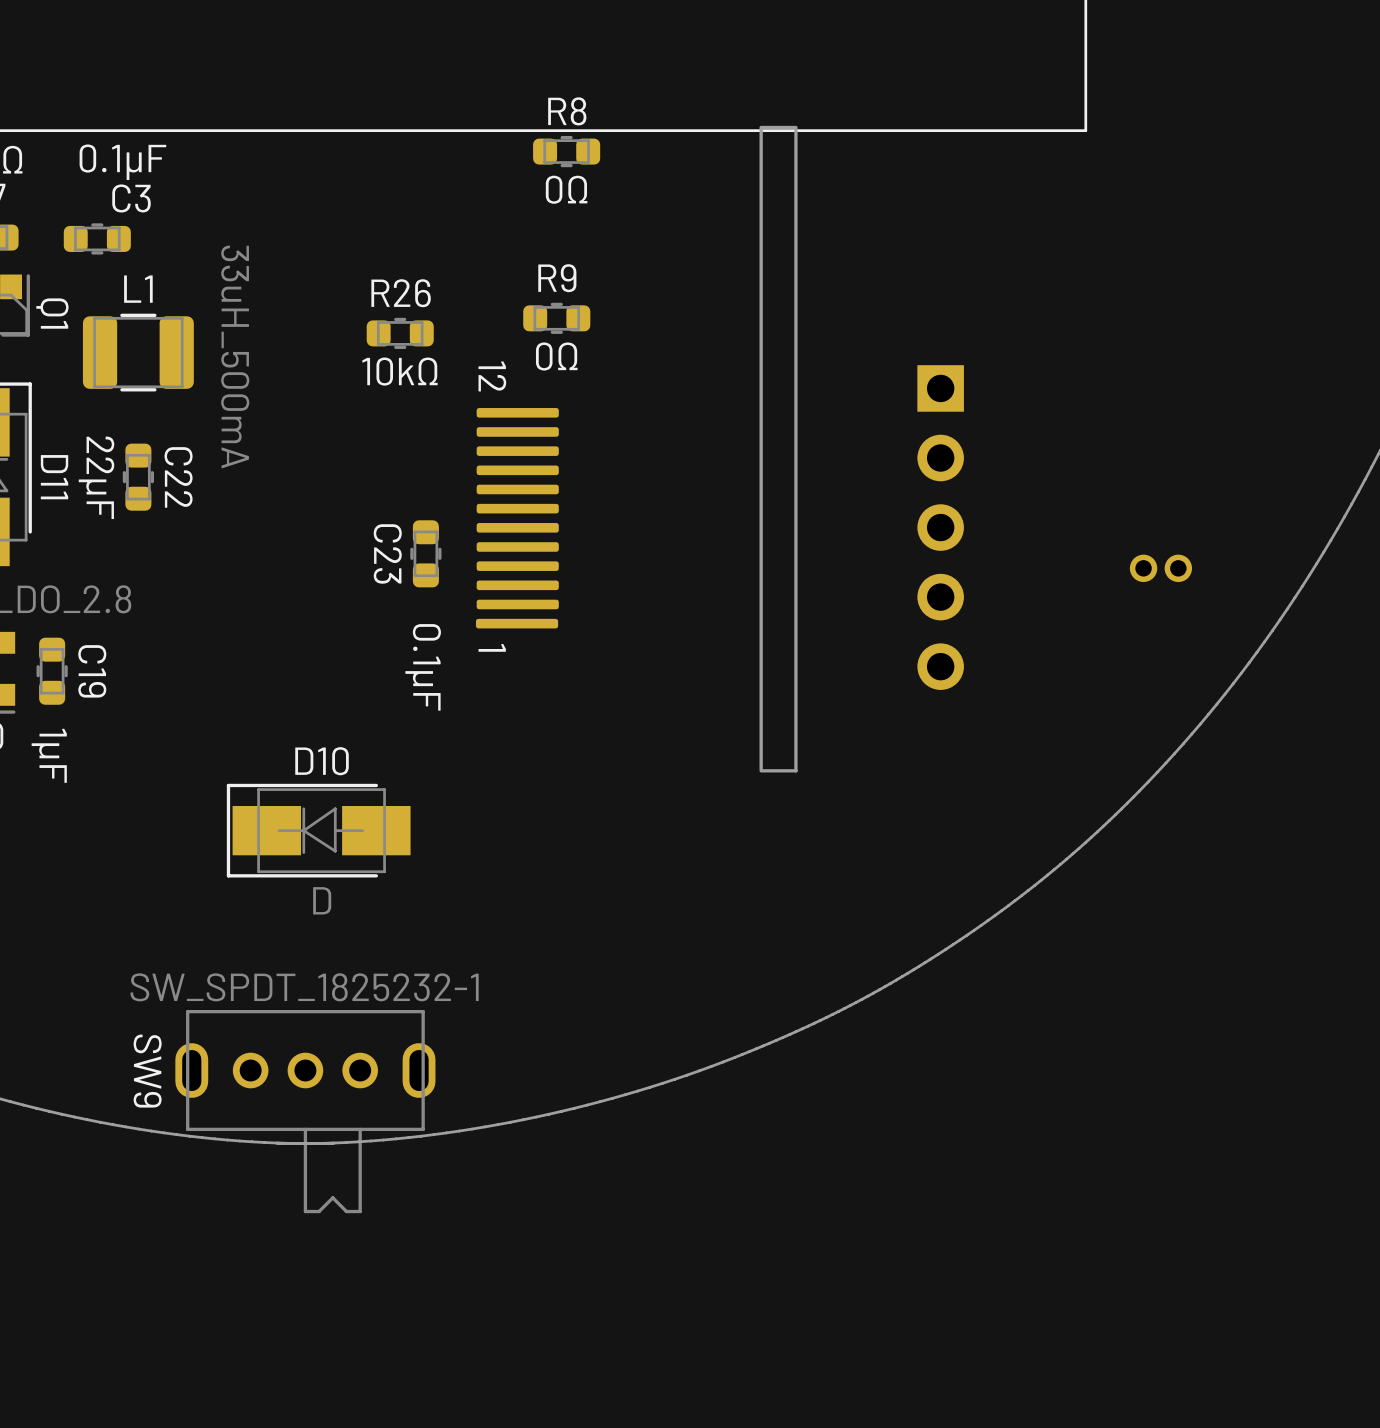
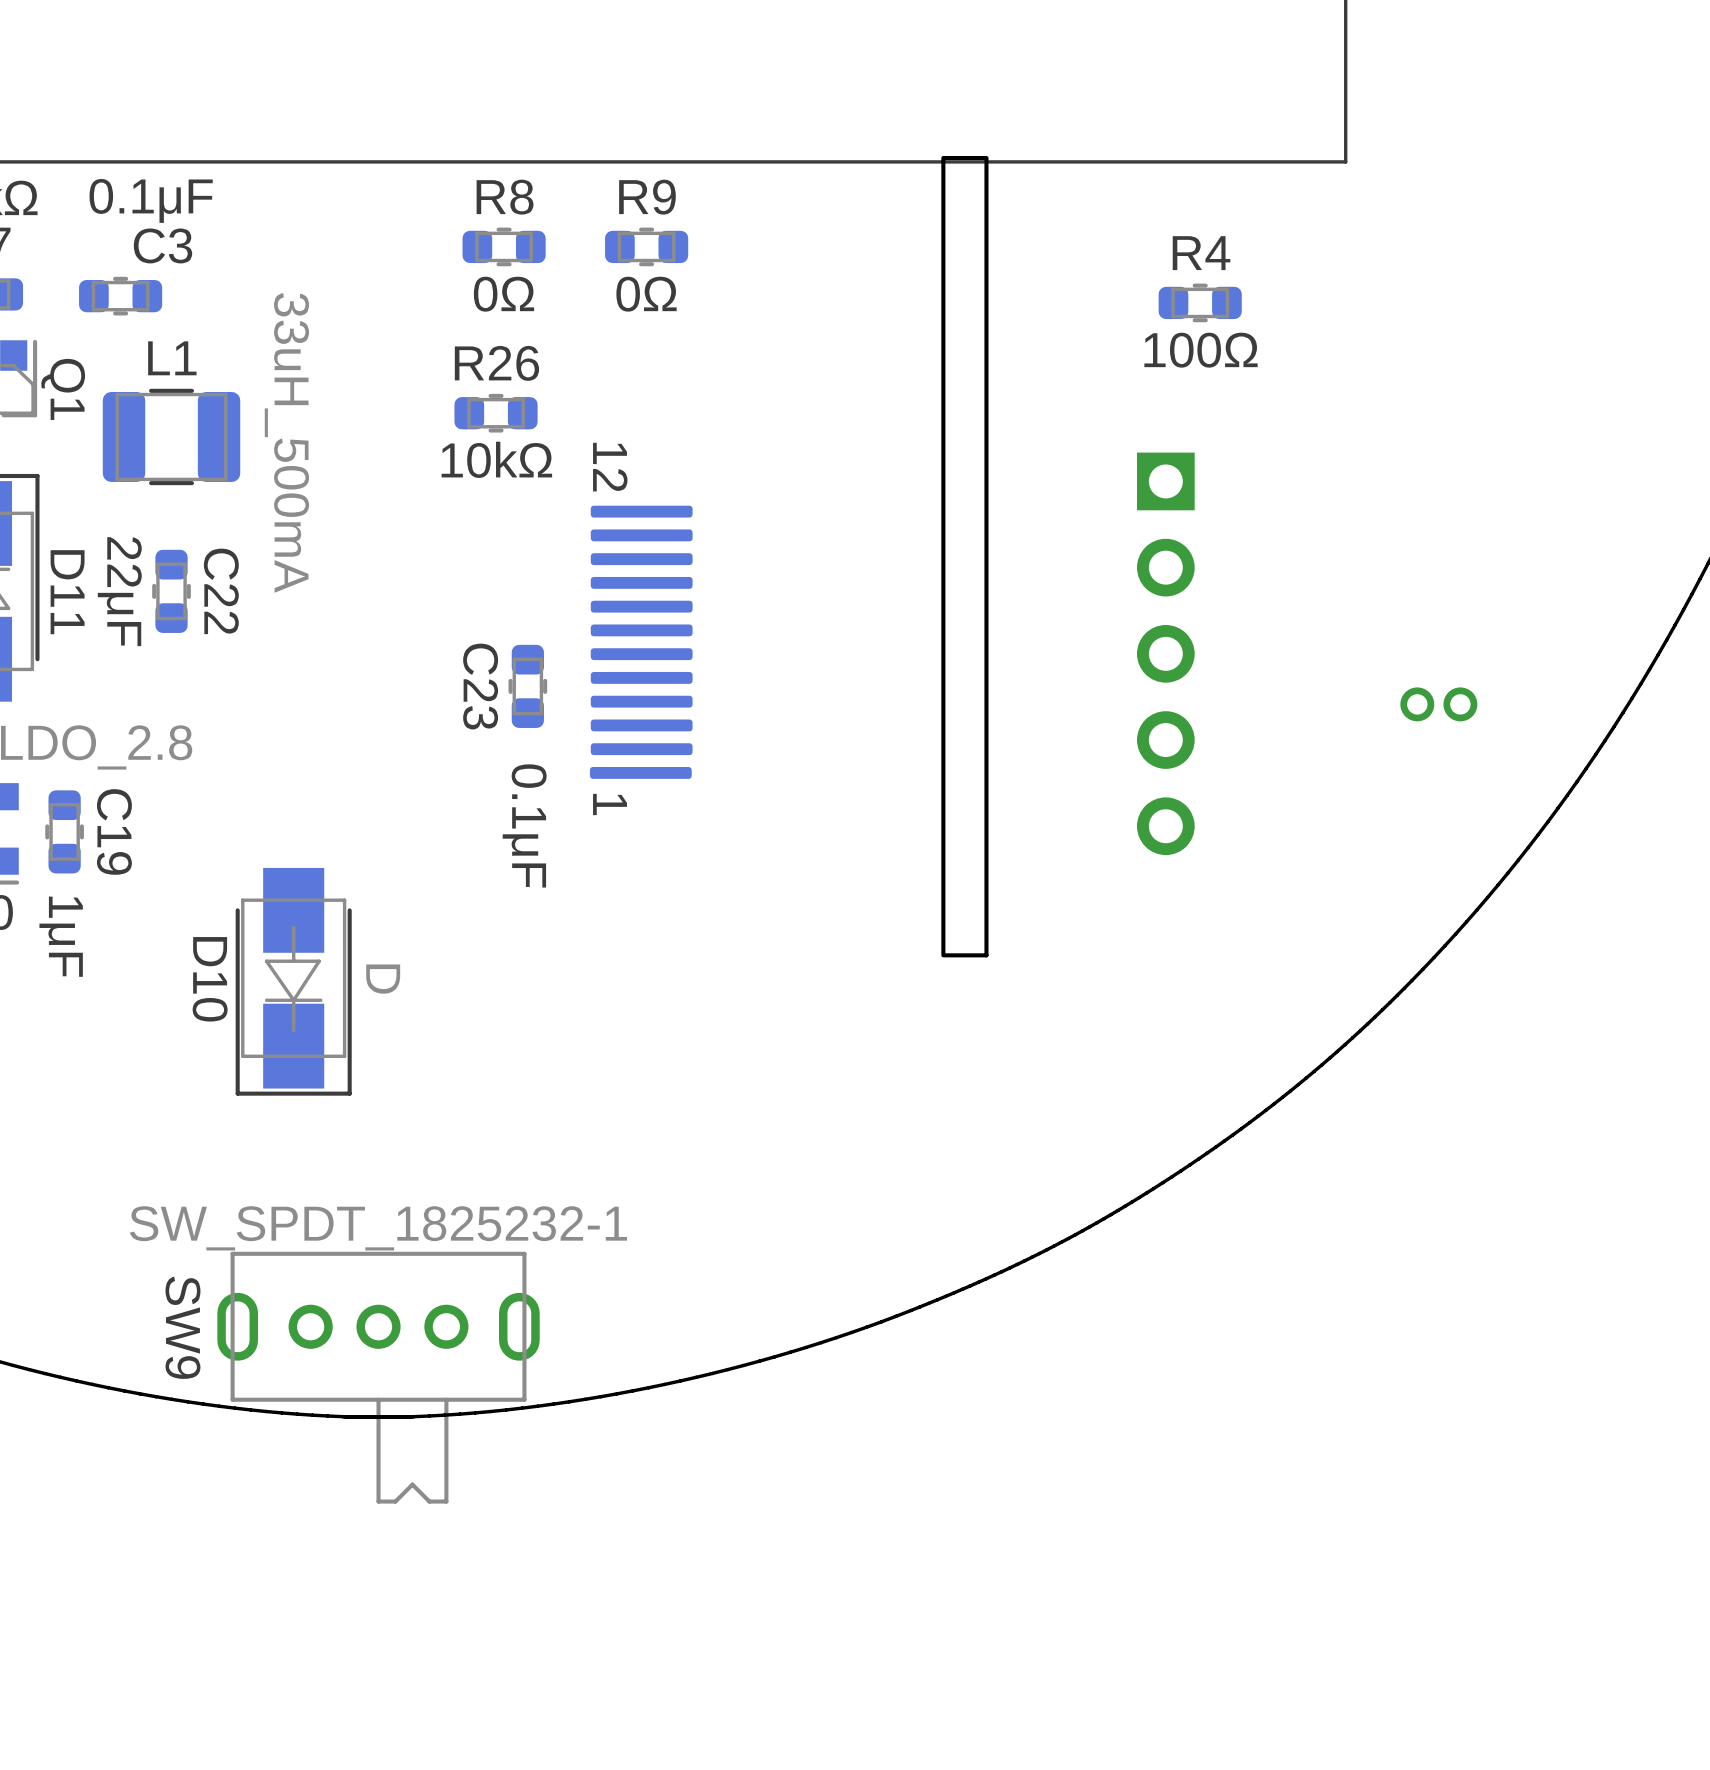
R8 position: (566, 151) -> (504, 246)
R4: none -> 100Ω (1200, 302)
R9 position: (556, 318) -> (646, 246)
D10 rotation: 0° (318, 830) -> 90° counterclockwise (293, 981)

